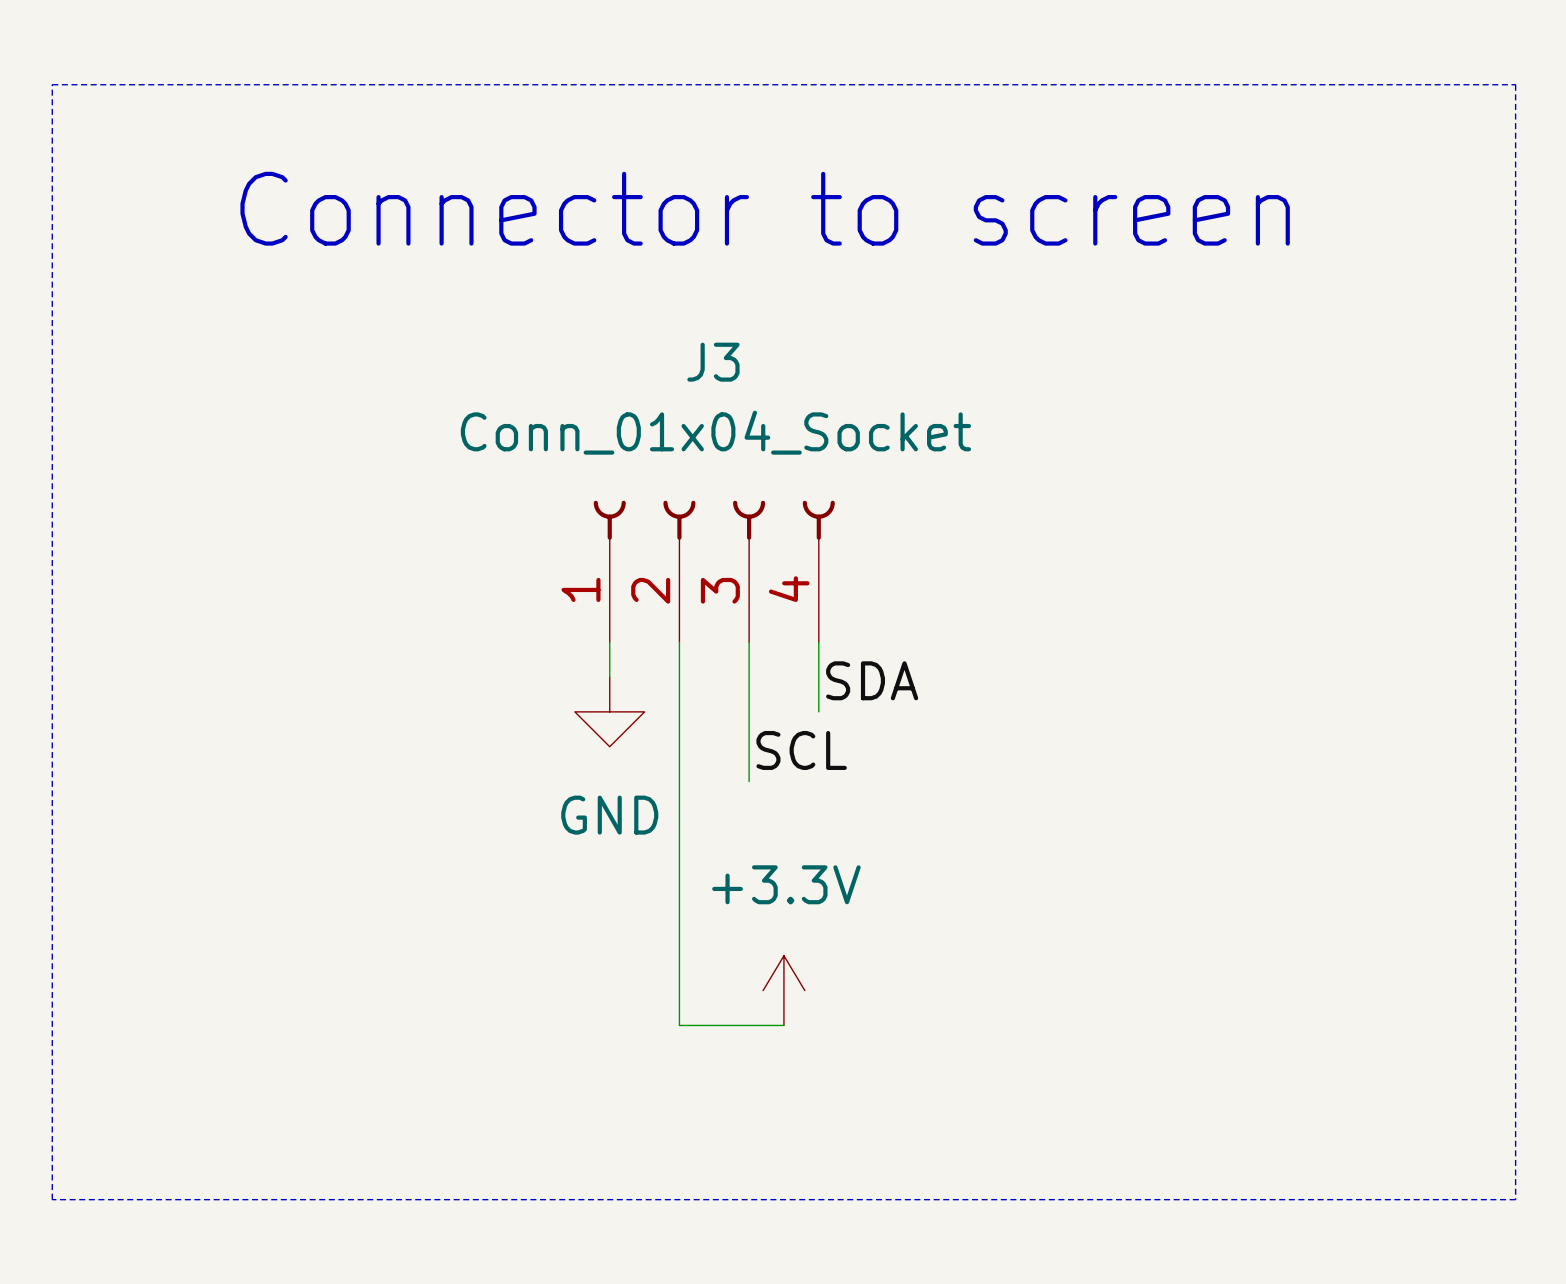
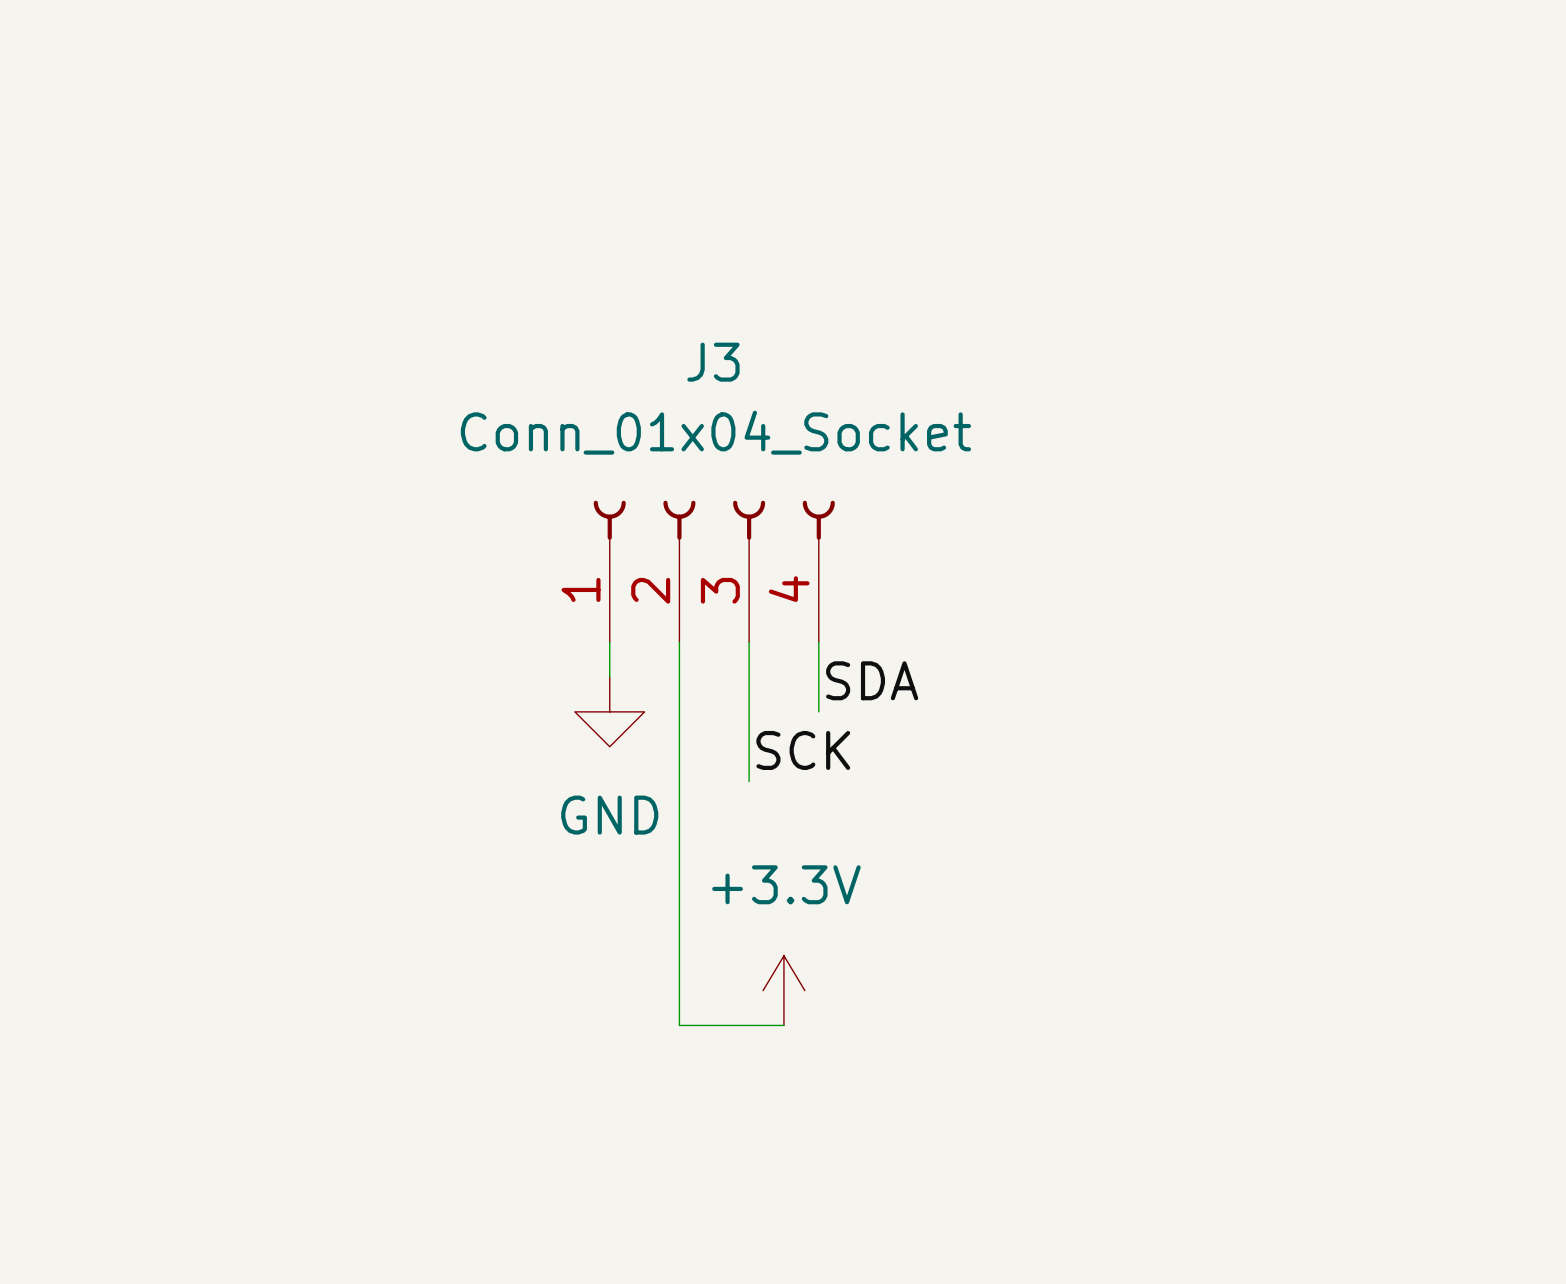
line: (52, 84) (1515, 84) (1515, 1199) (52, 1199) (52, 84) -> none
text: Connector to screen (765, 208) -> none
label: SCL (801, 750) -> SCK (803, 750)

